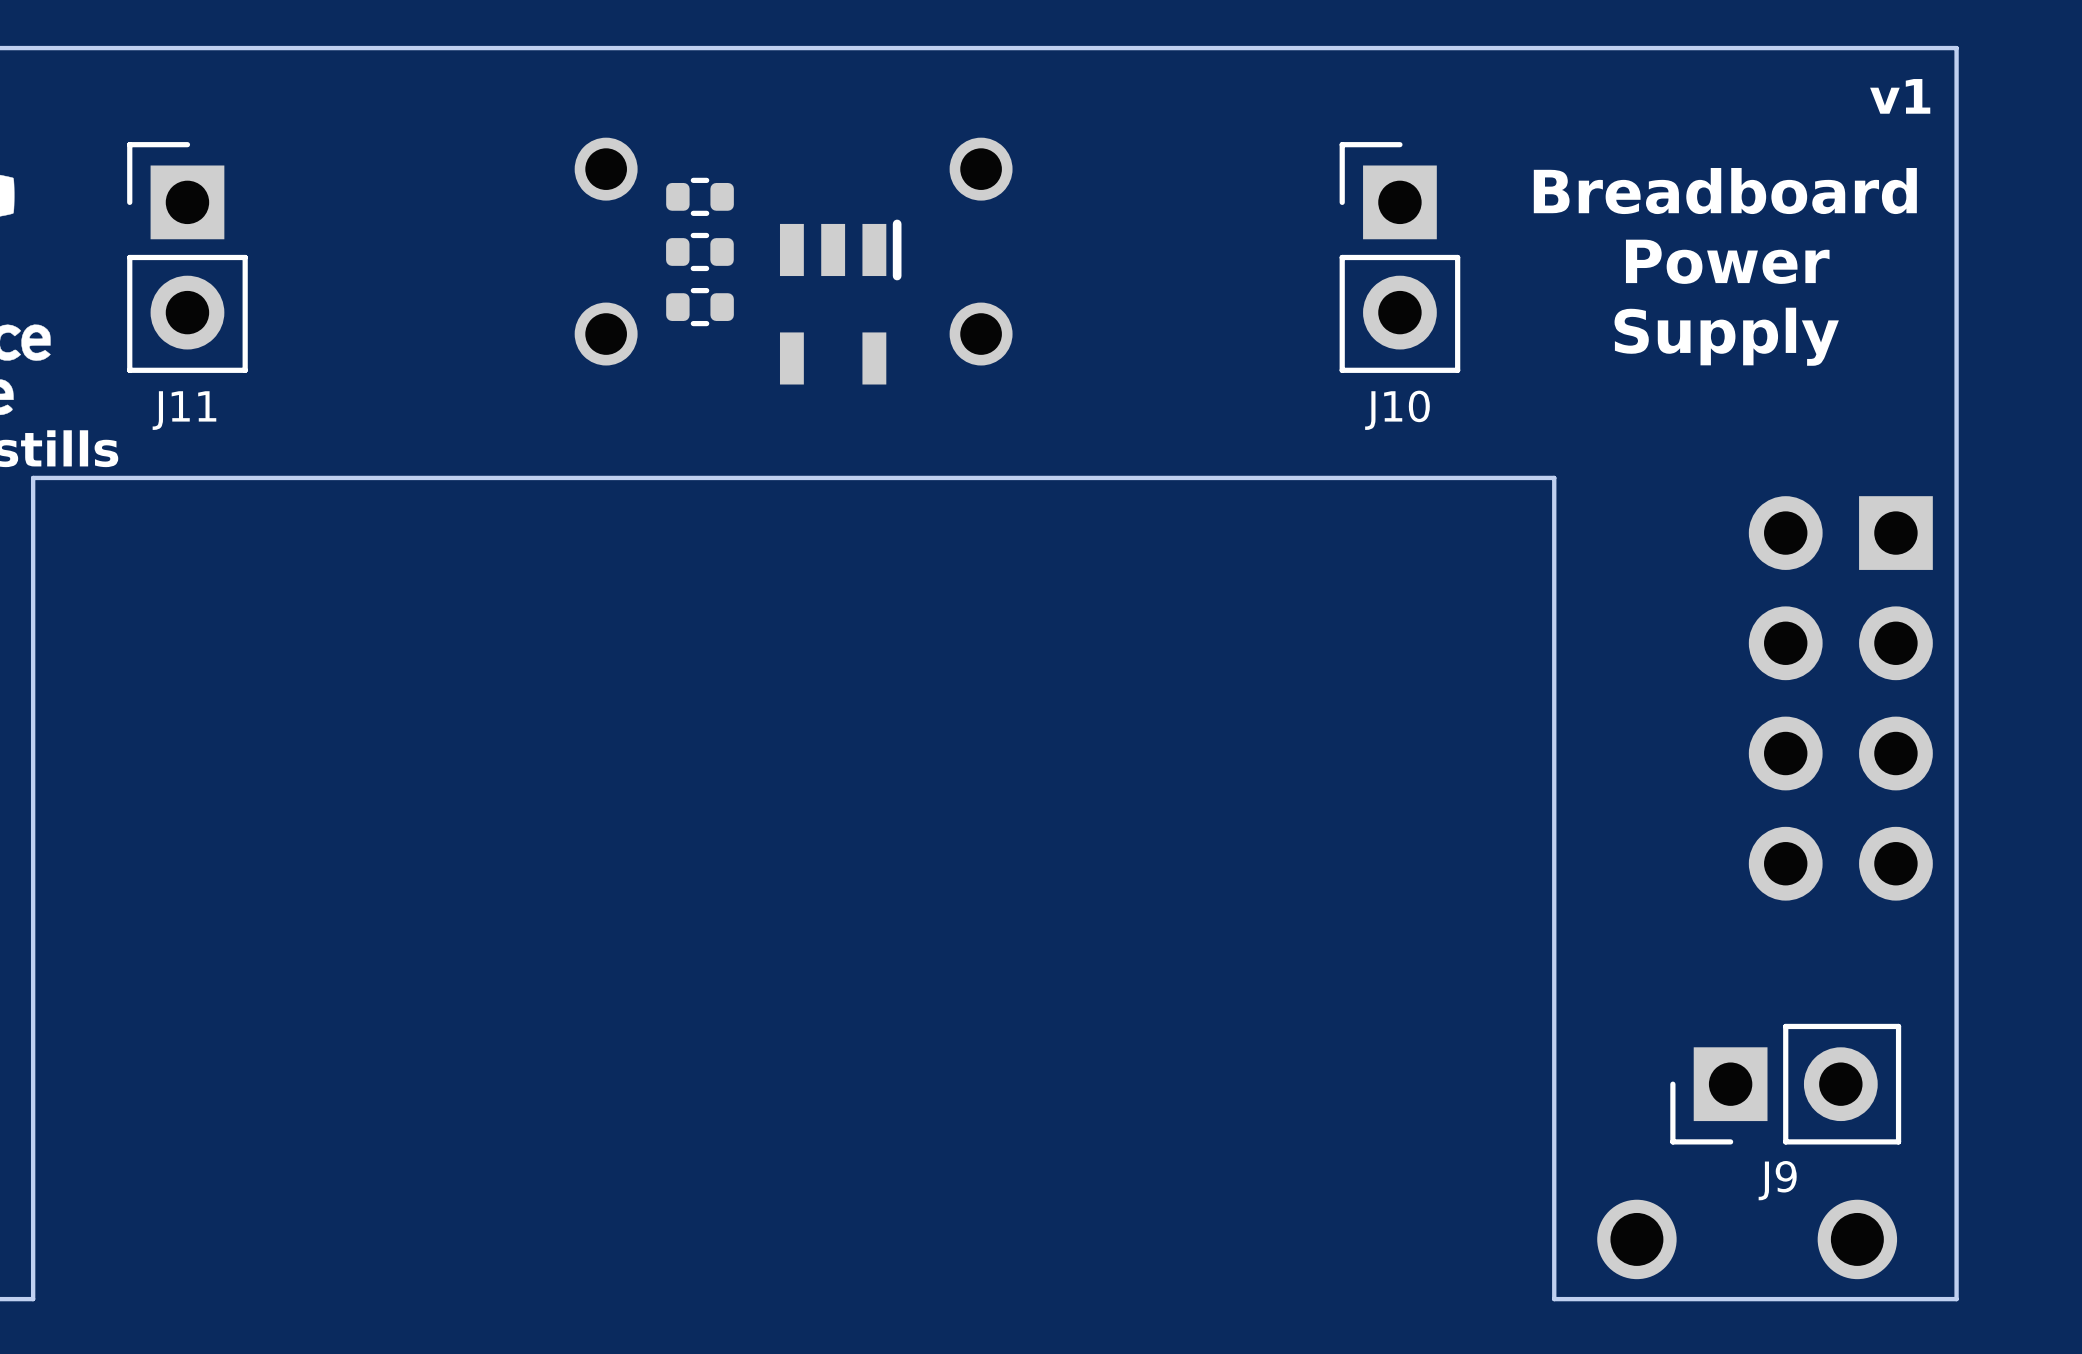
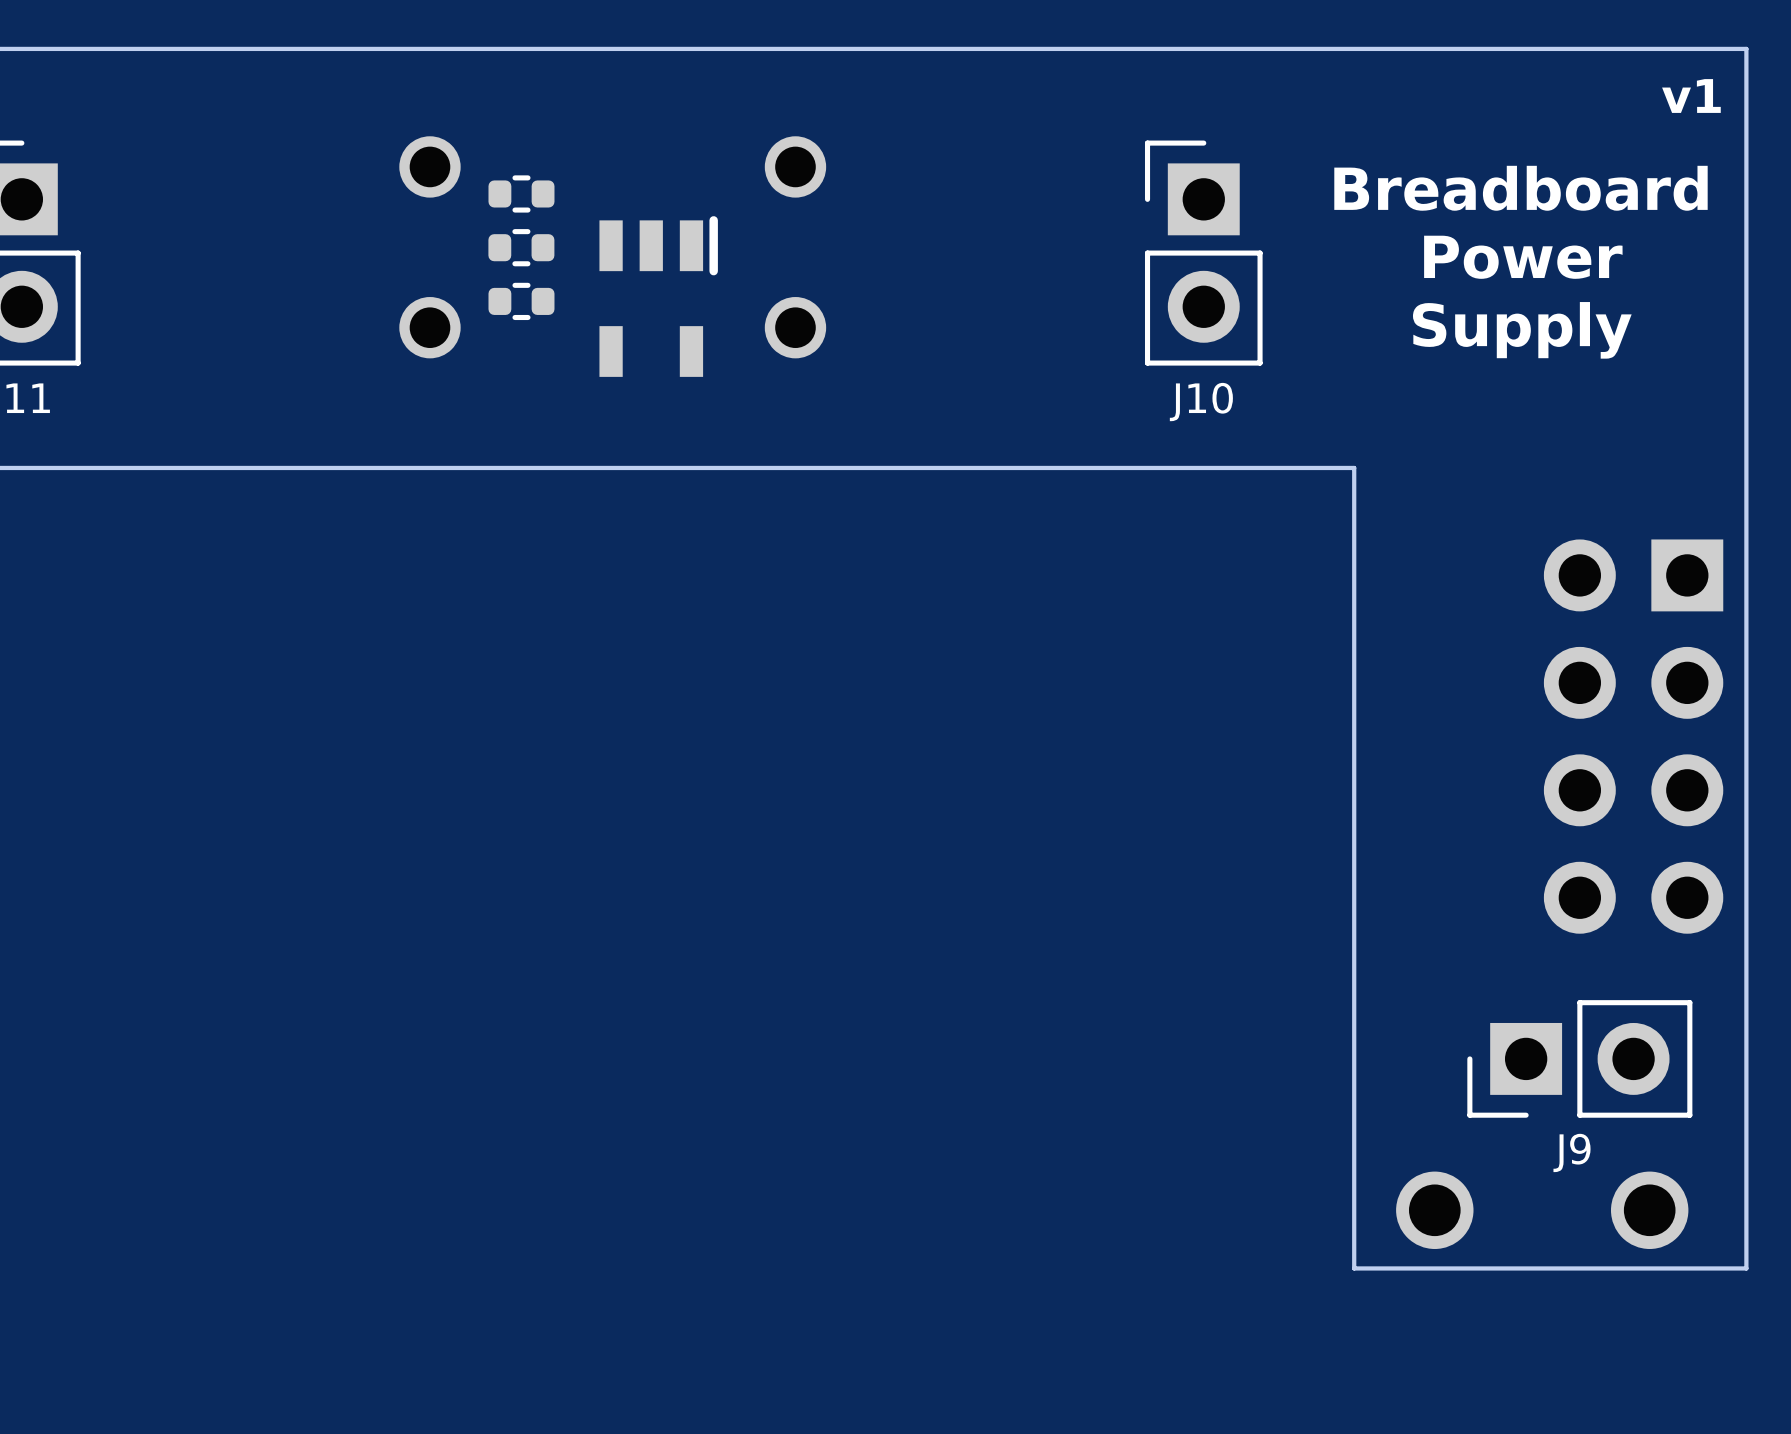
part position: (1840, 698) -> (1633, 736)

